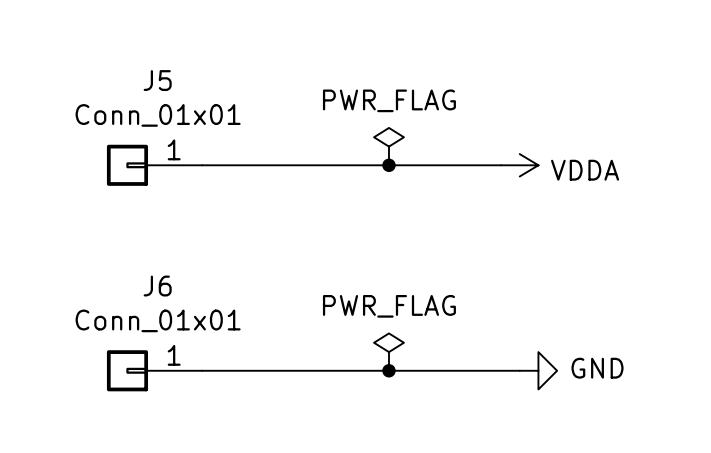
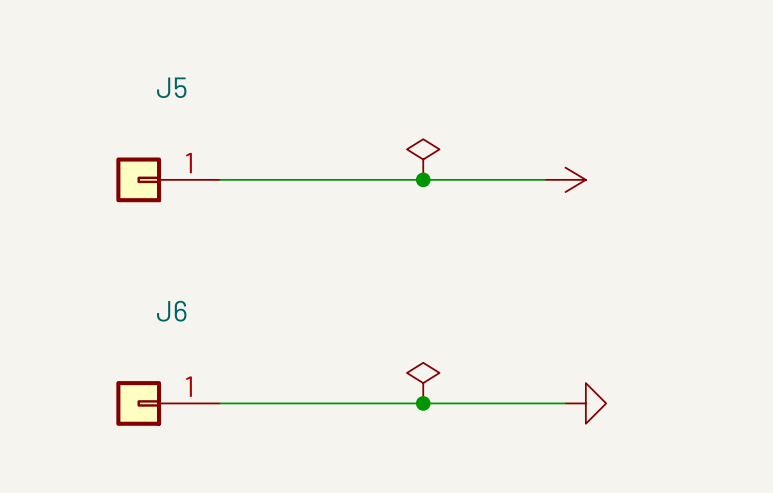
power symbol text: PWR_FLAG (389, 100) -> none
J5 value: Conn_01x01 (158, 115) -> none
power symbol text: VDDA (585, 170) -> none
power symbol text: PWR_FLAG (389, 306) -> none
J6 value: Conn_01x01 (158, 320) -> none
power symbol text: GND (597, 368) -> none

